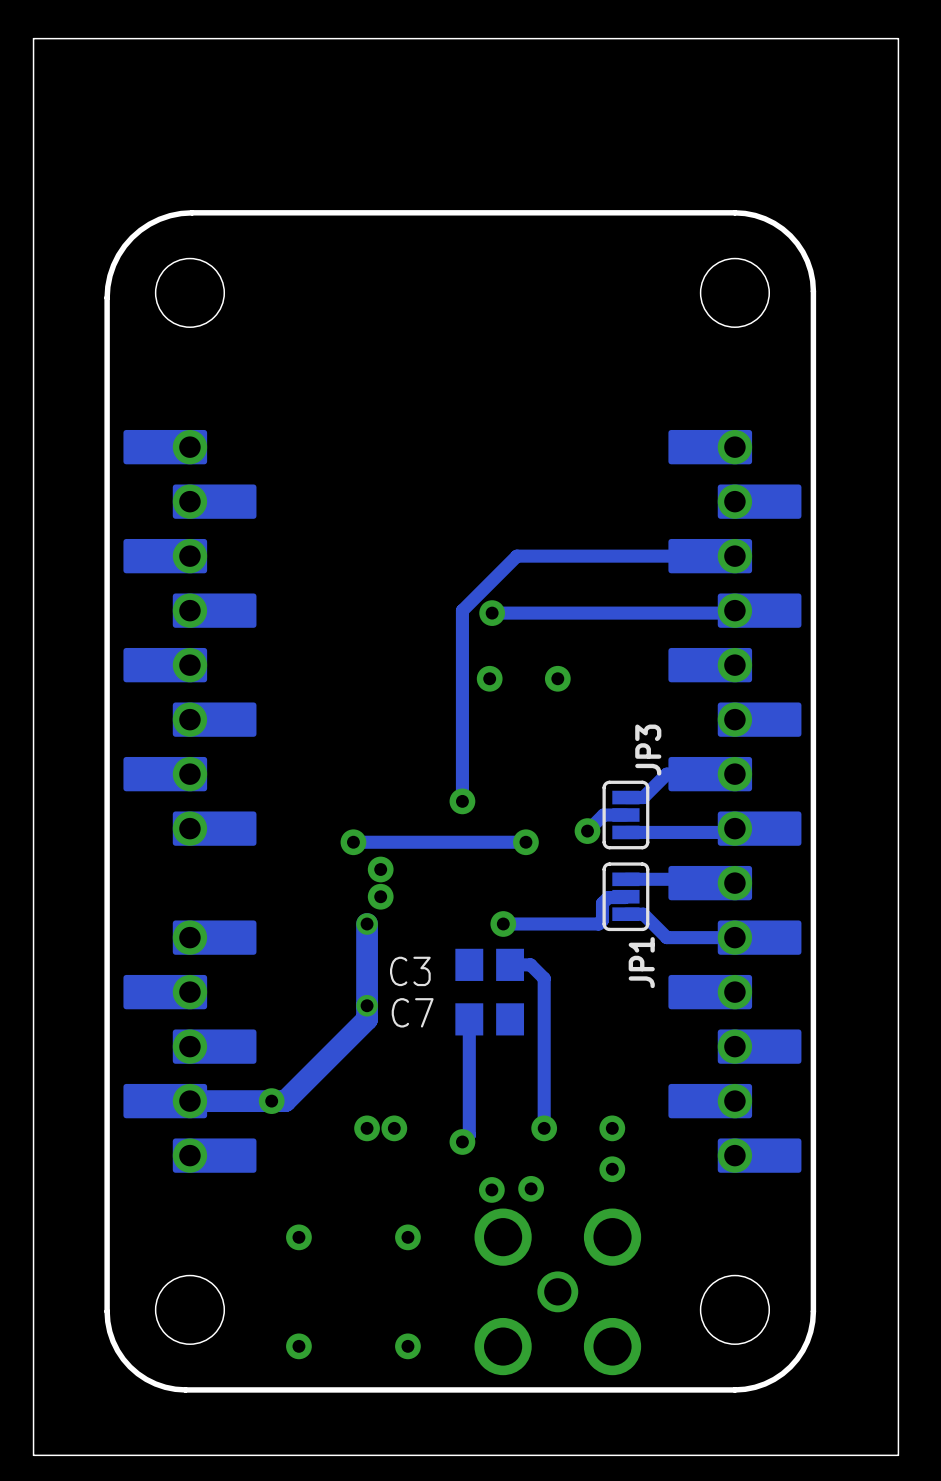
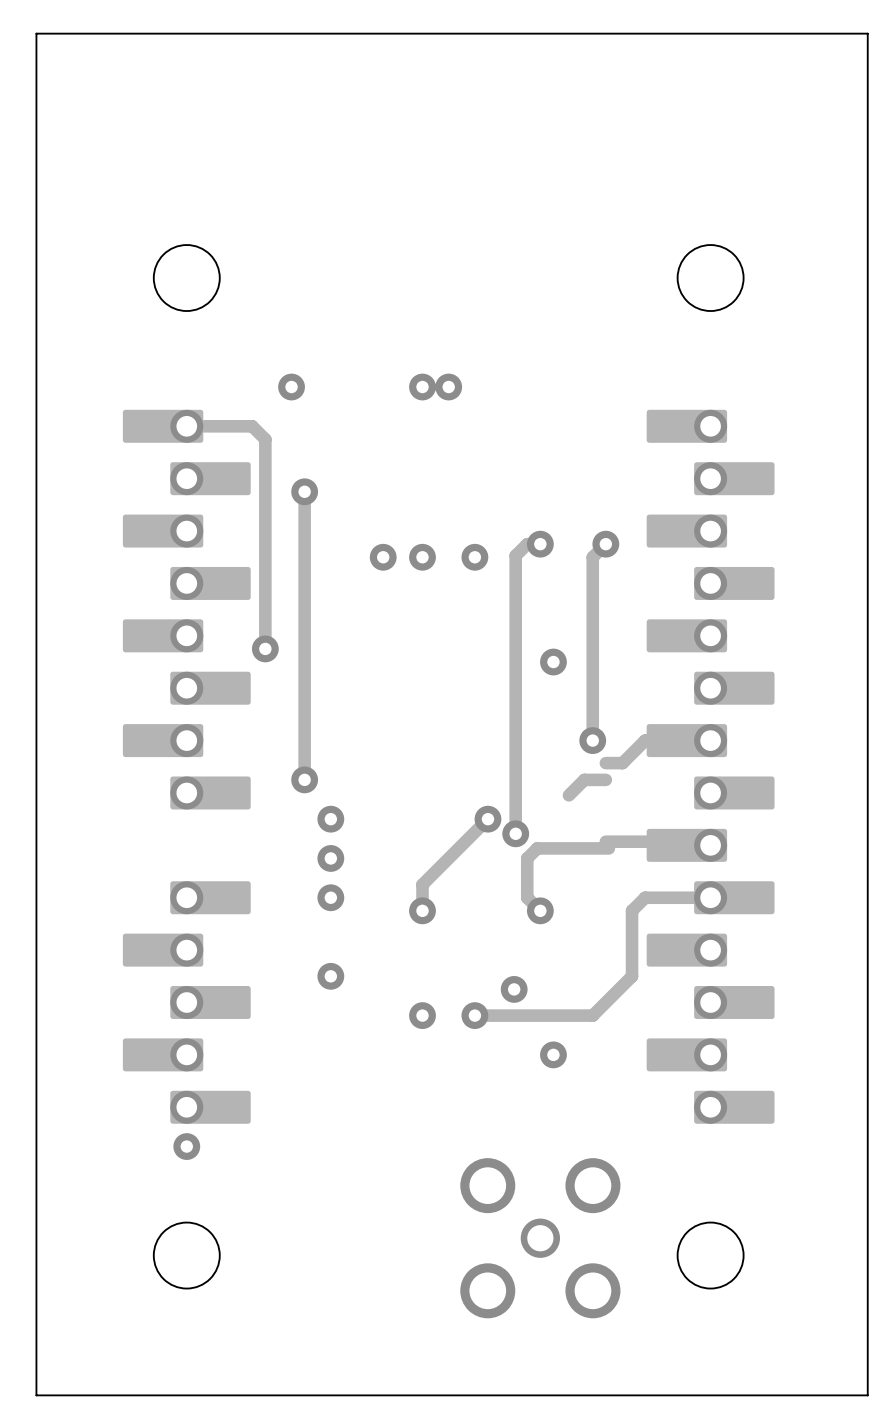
board edge: (734, 212) (181, 213) (159, 219) (140, 230) (118, 255) (110, 275) (107, 297) (107, 1311) (109, 1331) (117, 1350) (130, 1366) (146, 1379) (165, 1387) (185, 1389) (734, 1389) (755, 1387) (774, 1379) (790, 1366) (802, 1350) (810, 1331) (813, 1311) (813, 291) (807, 261) (790, 235) (764, 218) (734, 212) -> none
via: none -> (291, 387)
via: none -> (422, 387)
via: none -> (448, 387)
track: none -> (186, 426) (252, 426) (265, 439) (265, 648)
track: none -> (304, 491) (304, 779)
via: none -> (304, 491)
track: (734, 556) (516, 556) (462, 610) (462, 801) -> none
track: none -> (540, 544) (527, 544) (515, 555) (515, 833)
via: none -> (540, 544)
track: none -> (605, 544) (592, 557) (592, 740)
via: none -> (605, 544)
via: none -> (383, 557)
via: none -> (422, 557)
via: none -> (474, 557)
track: (734, 610) (732, 613) (492, 613) -> none
via: (492, 613) -> none
via: none -> (265, 648)
via: (489, 678) -> none
via position: (557, 678) -> (553, 662)
via: none -> (592, 740)
via: (462, 801) -> none
via: none -> (304, 779)
JP3: (625, 815) -> none
track: (734, 828) (731, 832) (625, 832) -> none
via: (587, 831) -> none
via position: (353, 842) -> (330, 819)
track: (525, 842) (353, 842) -> none
via: (525, 842) -> none
track: none -> (487, 819) (422, 884) (422, 910)
via: none -> (487, 819)
via: (380, 869) -> none
via: none -> (515, 833)
track: none -> (608, 848) (537, 848) (527, 858) (527, 897) (540, 910)
via: none -> (330, 858)
via: (380, 896) -> none
track: (625, 896) (608, 897) (602, 903) (602, 920) (598, 923) (503, 923) -> none
JP1: (625, 896) -> none
track: (625, 914) (643, 914) (666, 937) -> (474, 1015) (592, 1015) (632, 976) (632, 910) (645, 897)
track: (367, 923) (367, 1019) (285, 1101) (189, 1101) -> none
via: (367, 923) -> none
via: (503, 923) -> none
via: none -> (330, 897)
via: none -> (422, 910)
via: none -> (540, 910)
C3: (489, 964) -> none
track: (510, 964) (530, 964) (544, 978) (544, 1128) -> none
via: (367, 1005) -> none
via: none -> (330, 976)
track: (469, 1019) (469, 1135) (462, 1141) -> none
C7: (489, 1019) -> none
via: none -> (514, 989)
via: none -> (422, 1015)
via: none -> (474, 1015)
via: (271, 1101) -> none
via: none -> (553, 1054)
via: (367, 1128) -> none
via: (394, 1128) -> none
via: (544, 1128) -> none
via: (612, 1128) -> none
via: (462, 1141) -> none
via: (612, 1169) -> none
via: (531, 1188) -> none
via: (491, 1189) -> none
via: none -> (186, 1146)
via: (298, 1237) -> none
via: (407, 1237) -> none
via: (298, 1346) -> none
via: (407, 1346) -> none

